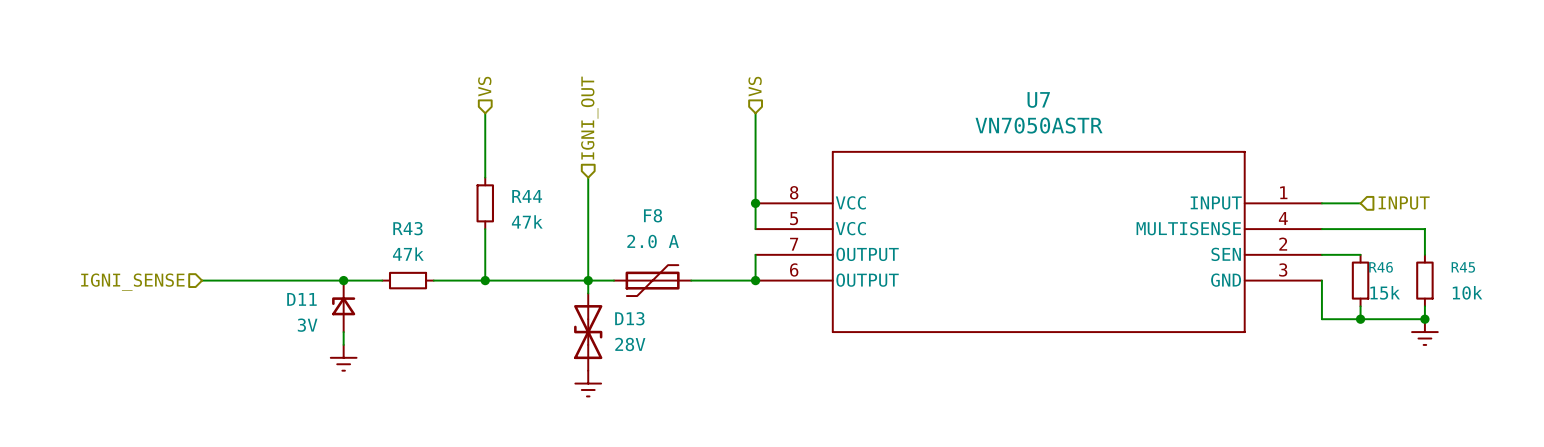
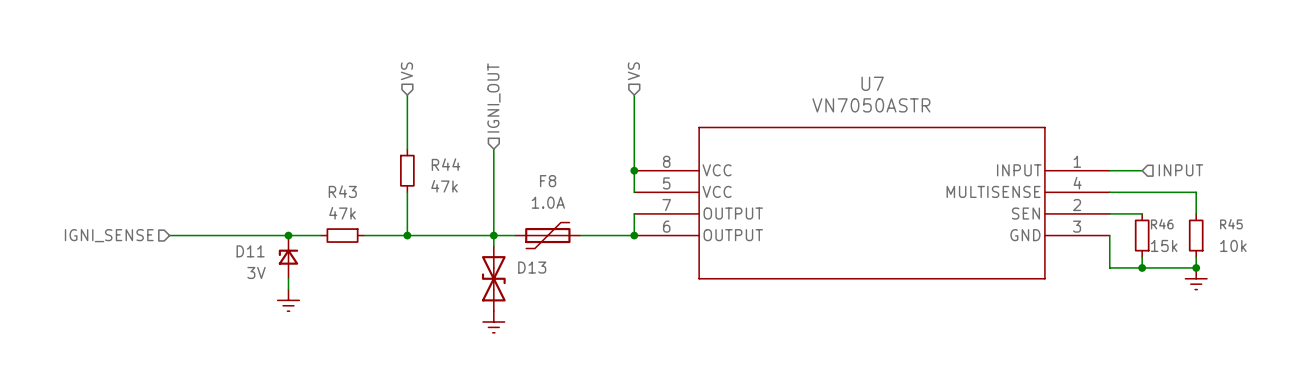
F8 value: 2.0 A (653, 241) -> 1.0A (548, 202)
D13 value: 28V (630, 344) -> none

